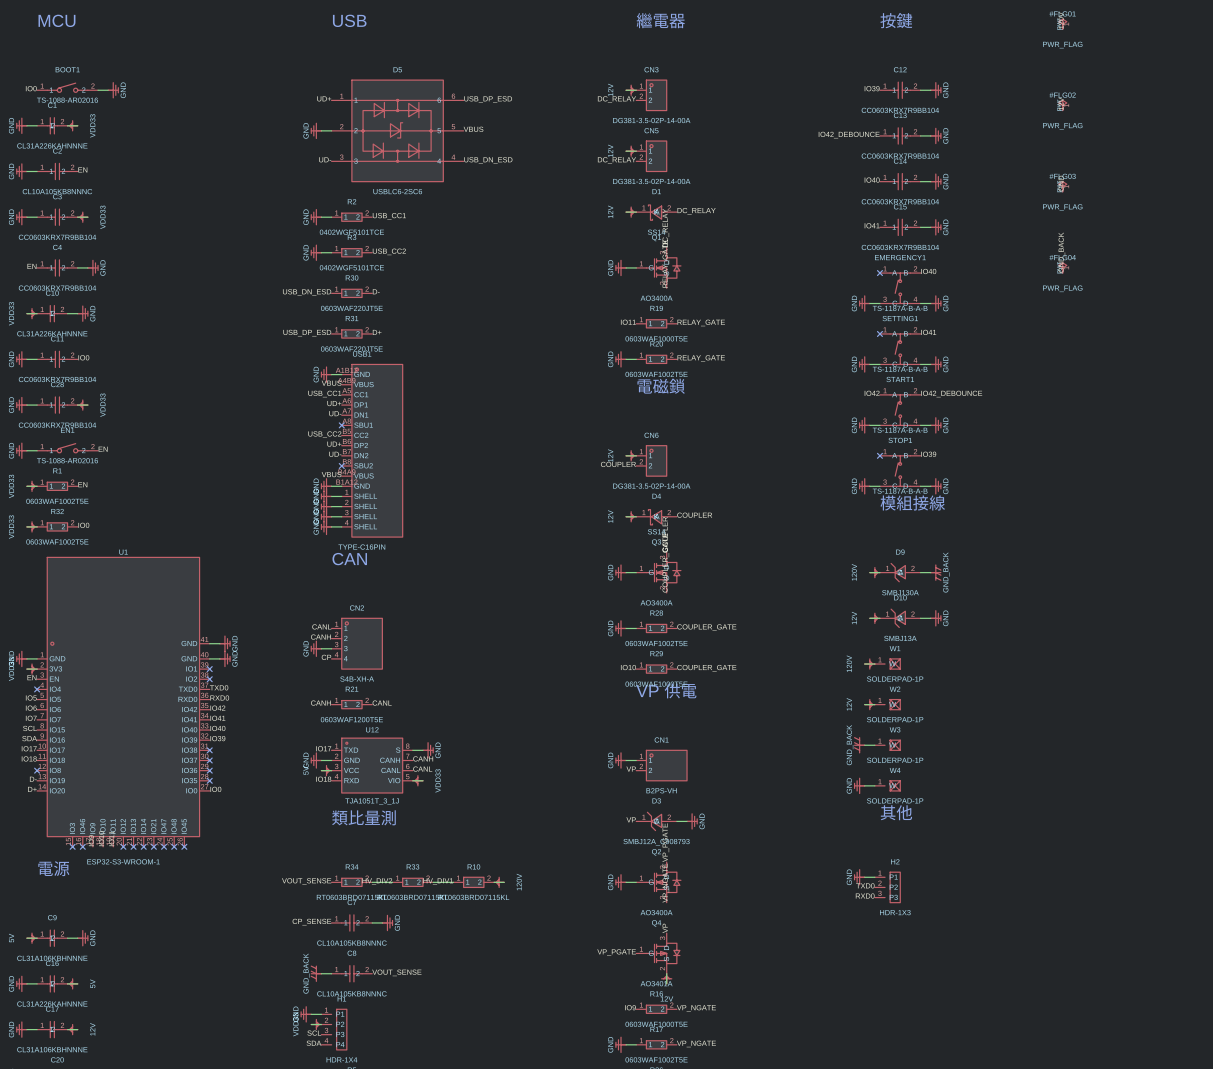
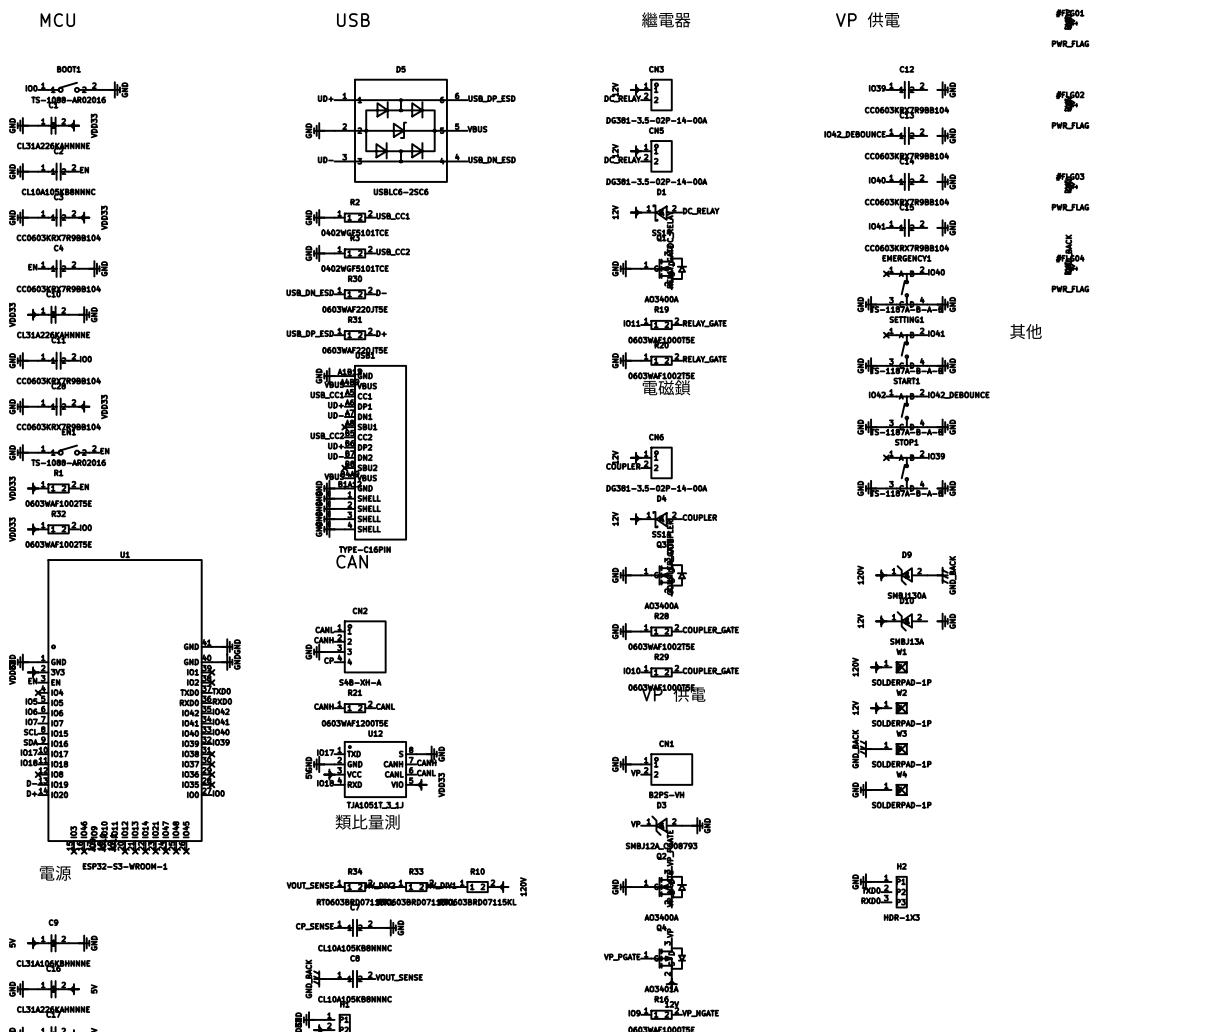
text: none -> VP 供電 (868, 19)
text: 按鍵 (896, 20) -> none
wire: (920, 90) (930, 90) -> none
wire: (920, 135) (930, 135) -> none
wire: (920, 181) (930, 181) -> none
wire: (920, 227) (930, 227) -> none
text: none -> 其他 (1025, 331)
wire: (920, 486) (930, 486) -> none
text: 模組接線 (912, 503) -> none
wire: (920, 618) (930, 618) -> none
text: 其他 (896, 812) -> none

